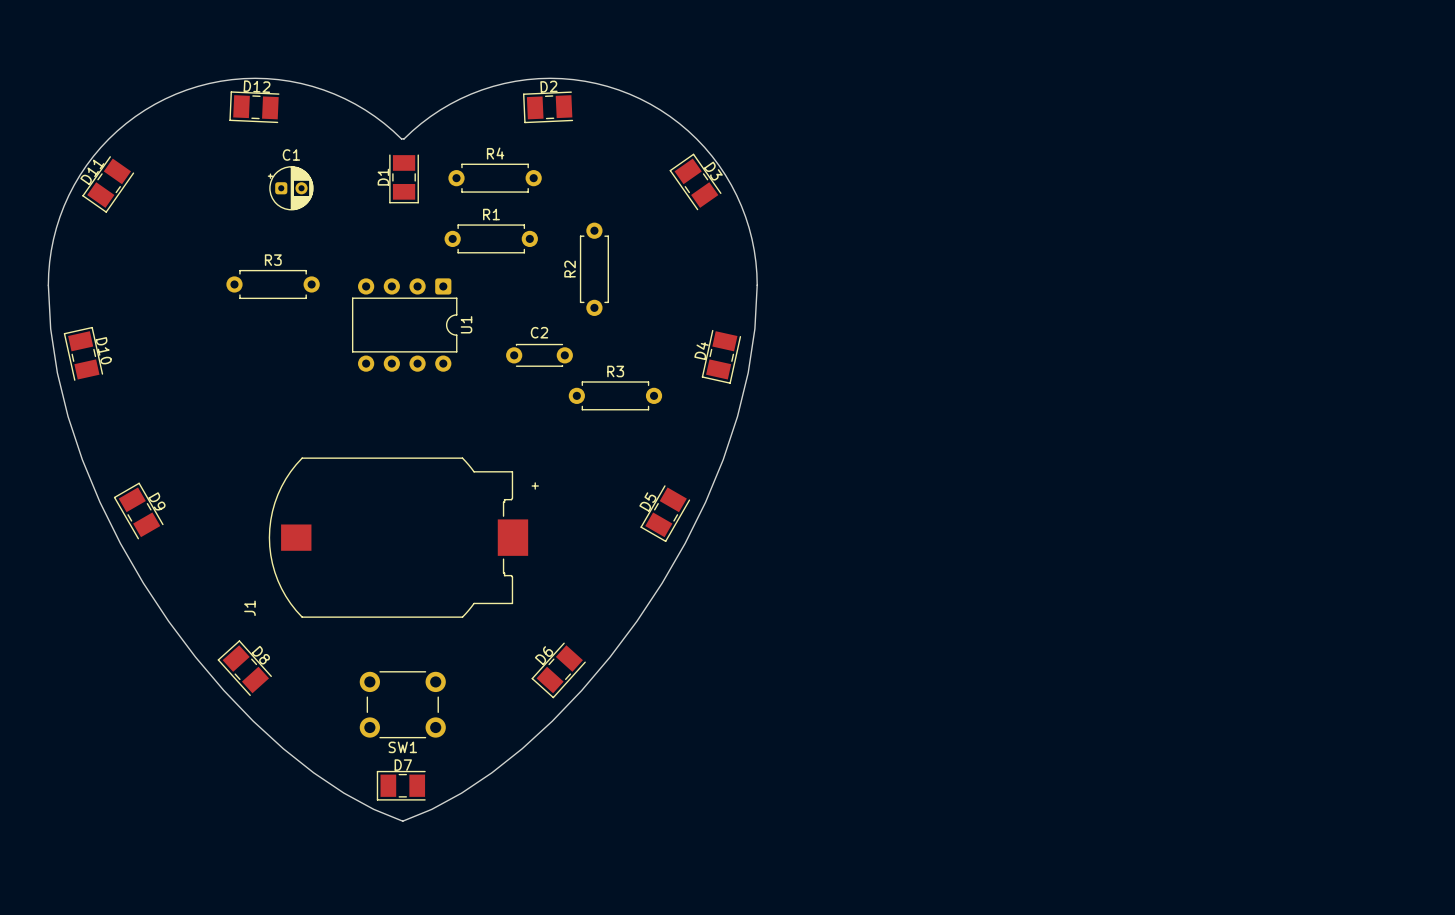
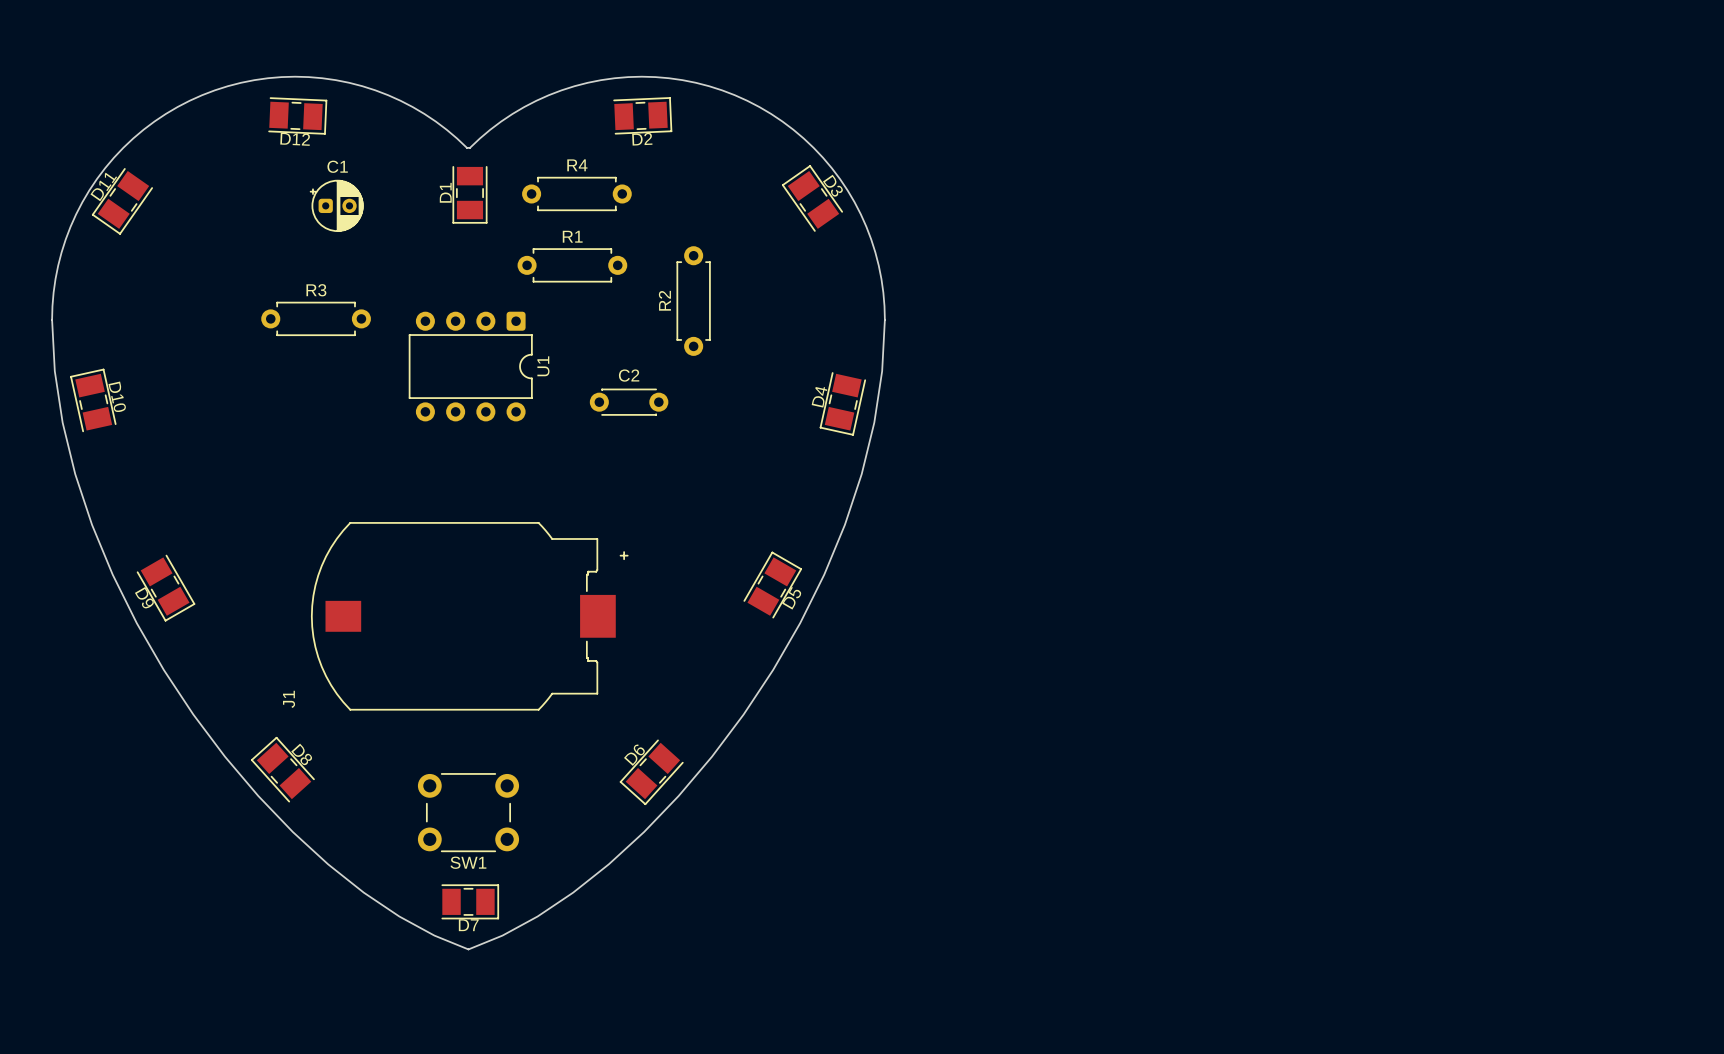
D12 rotation: 0° (254, 107) -> 180° (297, 115)
D2 rotation: 0° (548, 107) -> 180° (642, 115)
R3: (615, 395) -> none
D9 rotation: 0° (138, 511) -> 180° (166, 588)
D5 rotation: 0° (665, 513) -> 180° (772, 585)
D7 rotation: 0° (401, 785) -> 180° (470, 901)

